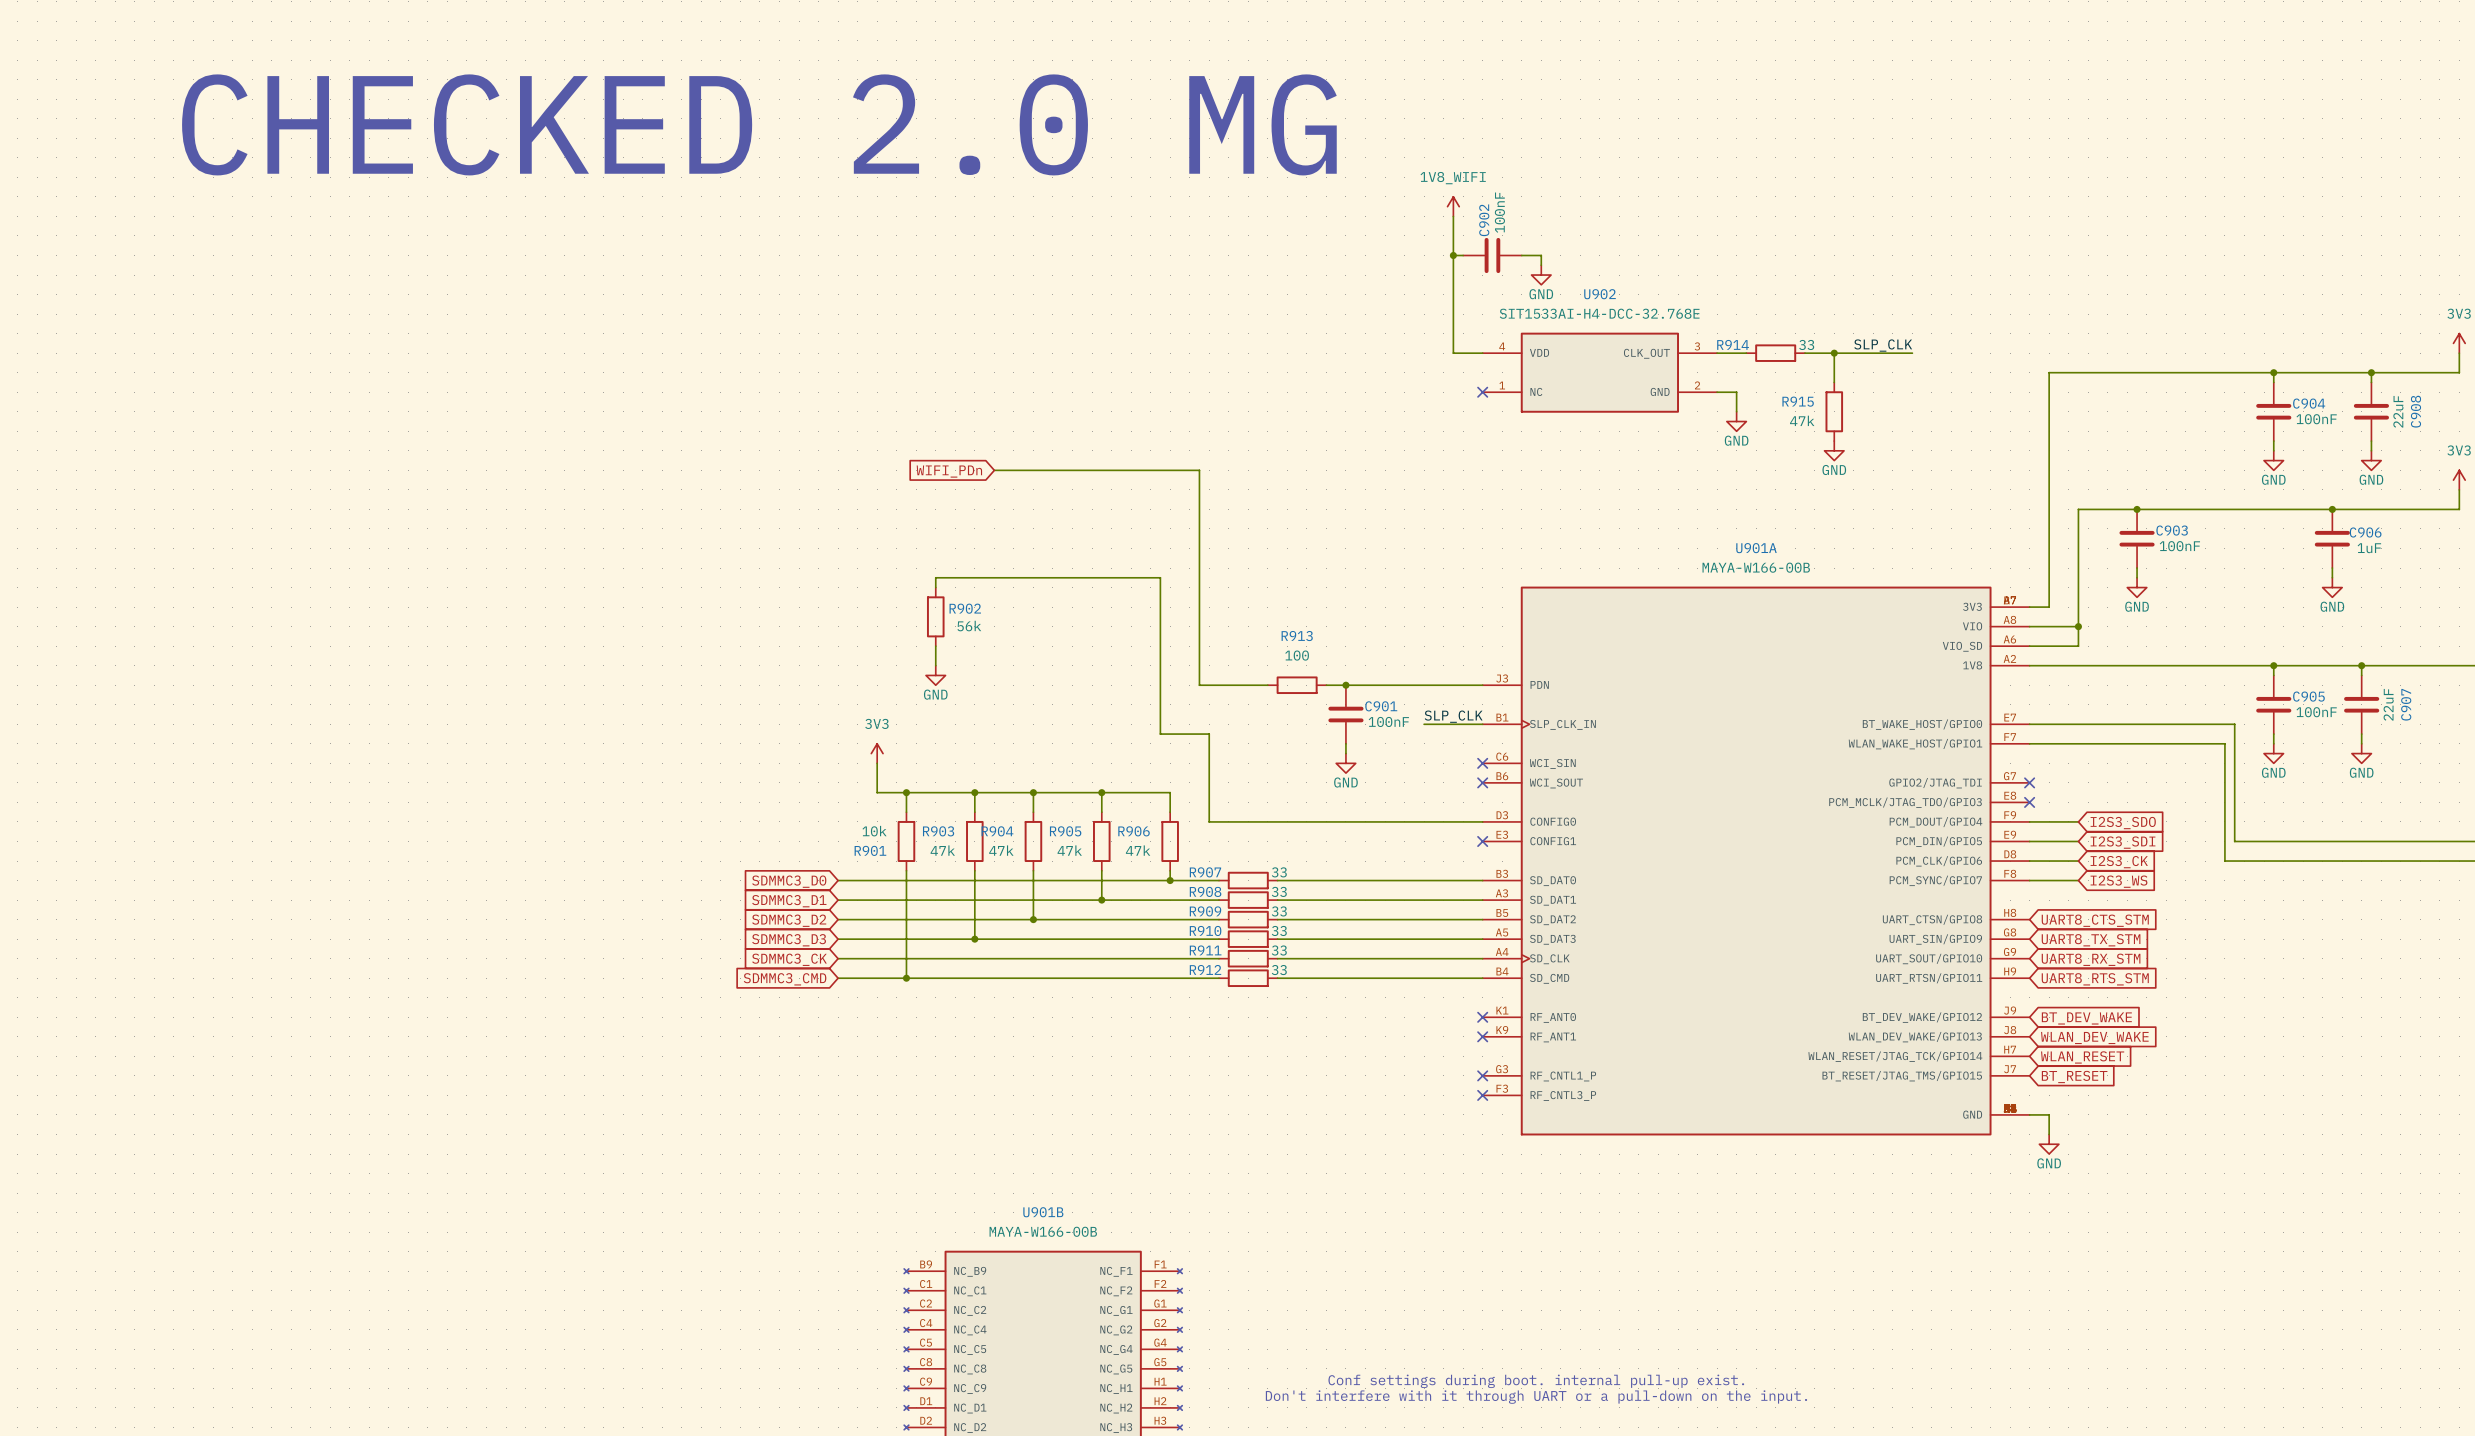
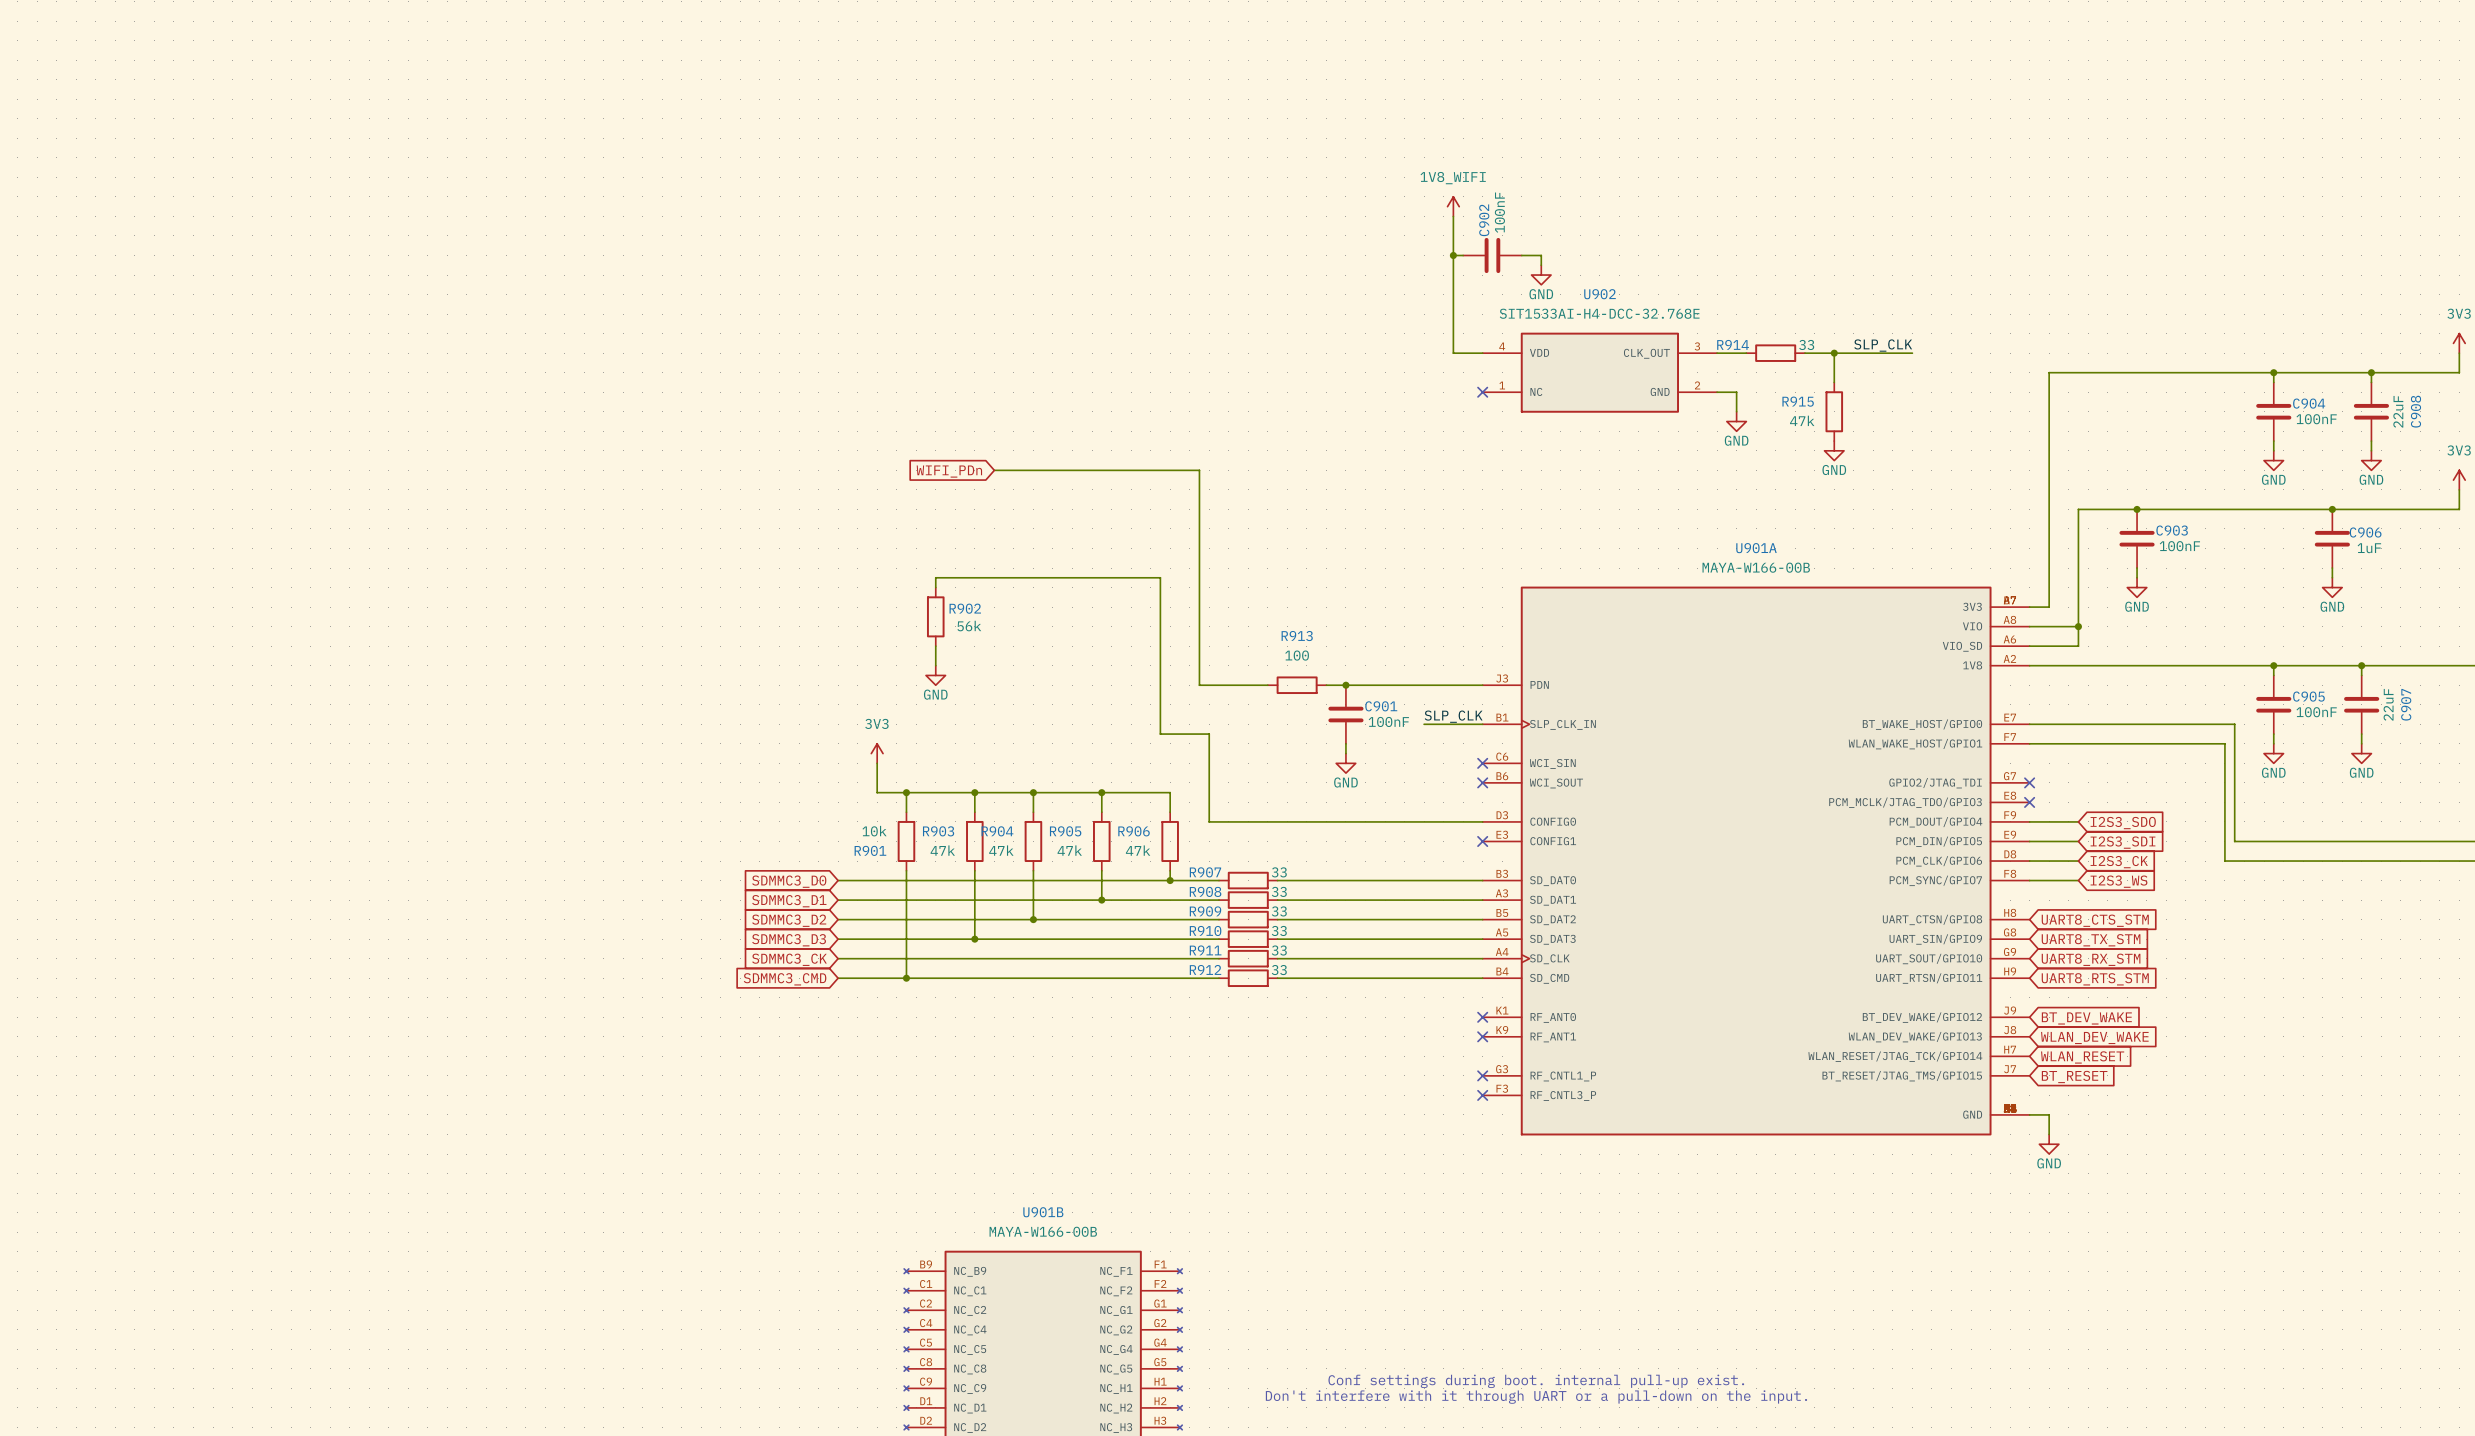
text: CHECKED 2.0 MG (759, 124) -> none

